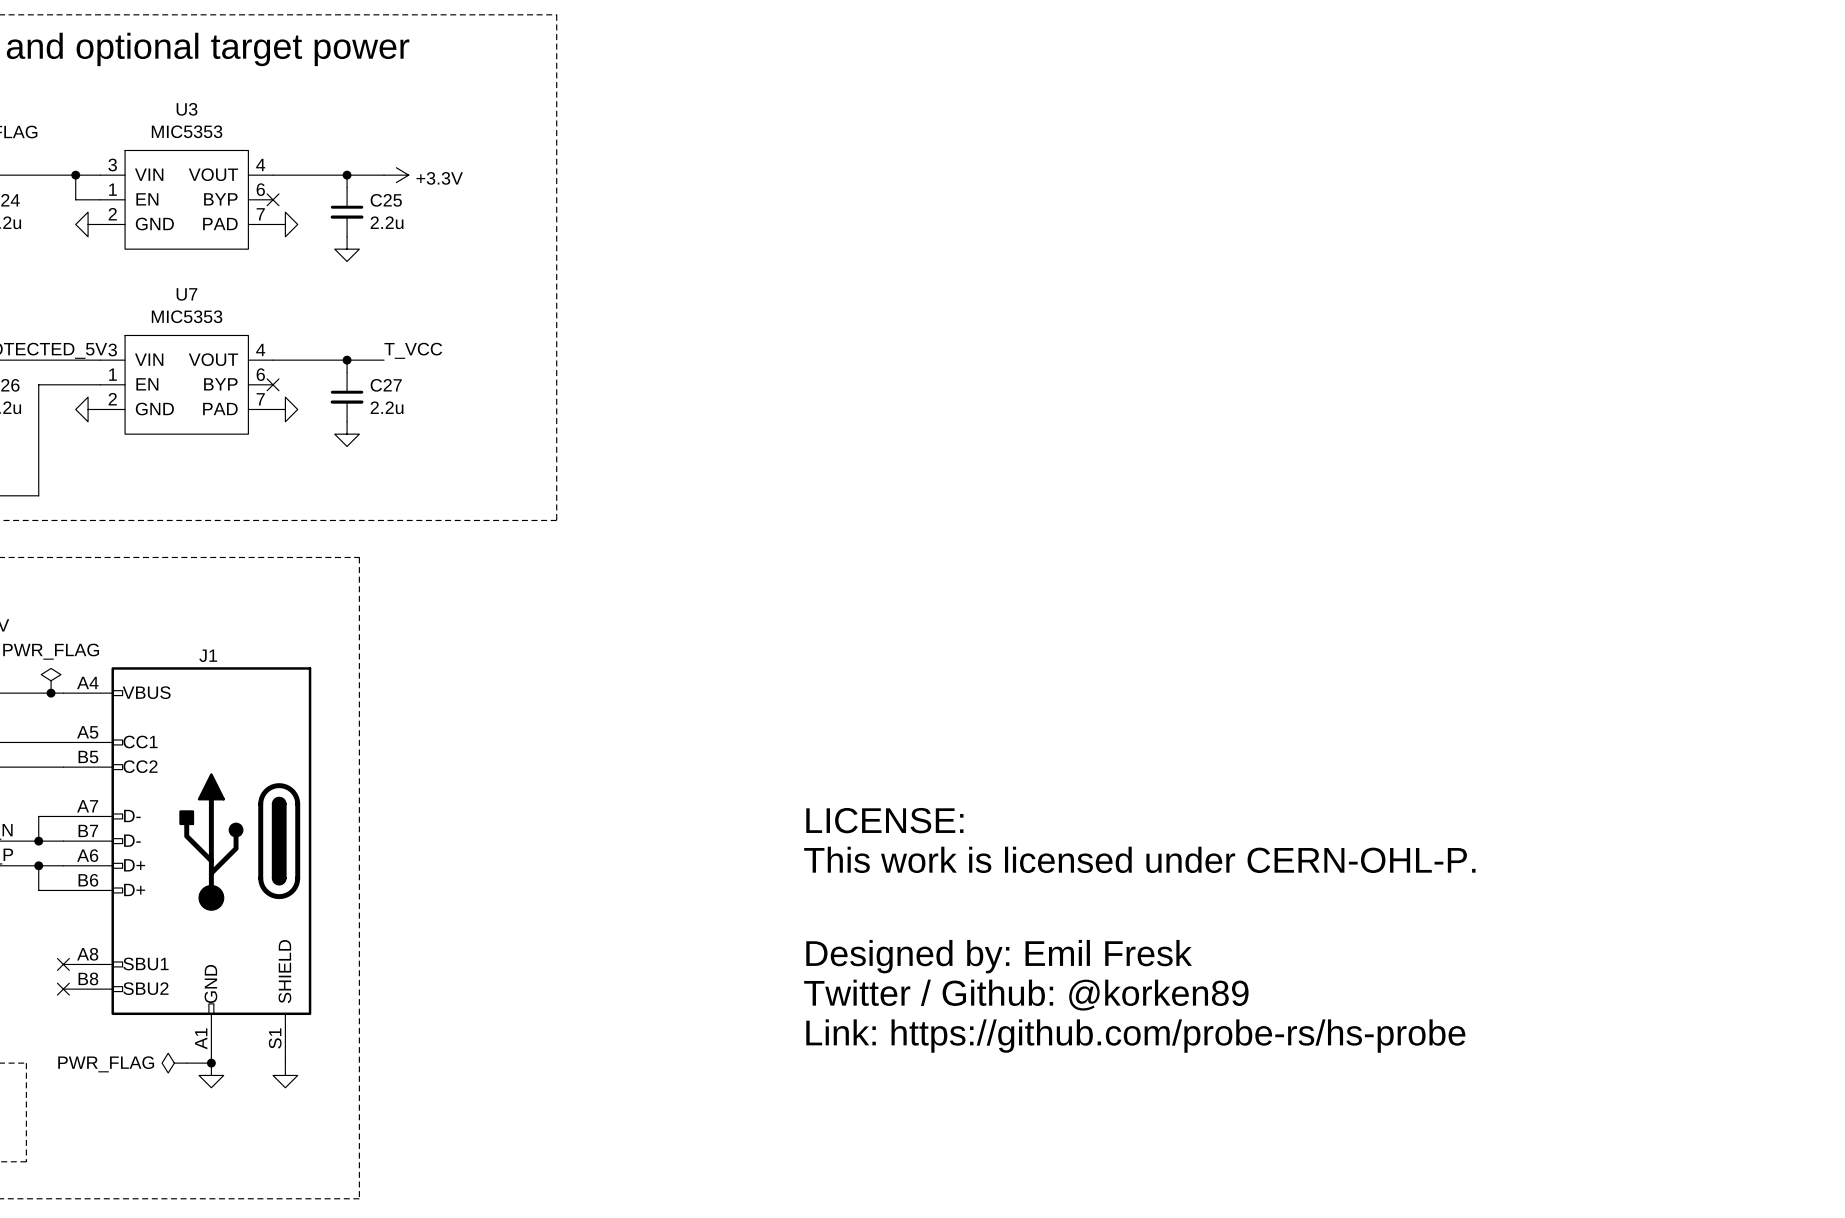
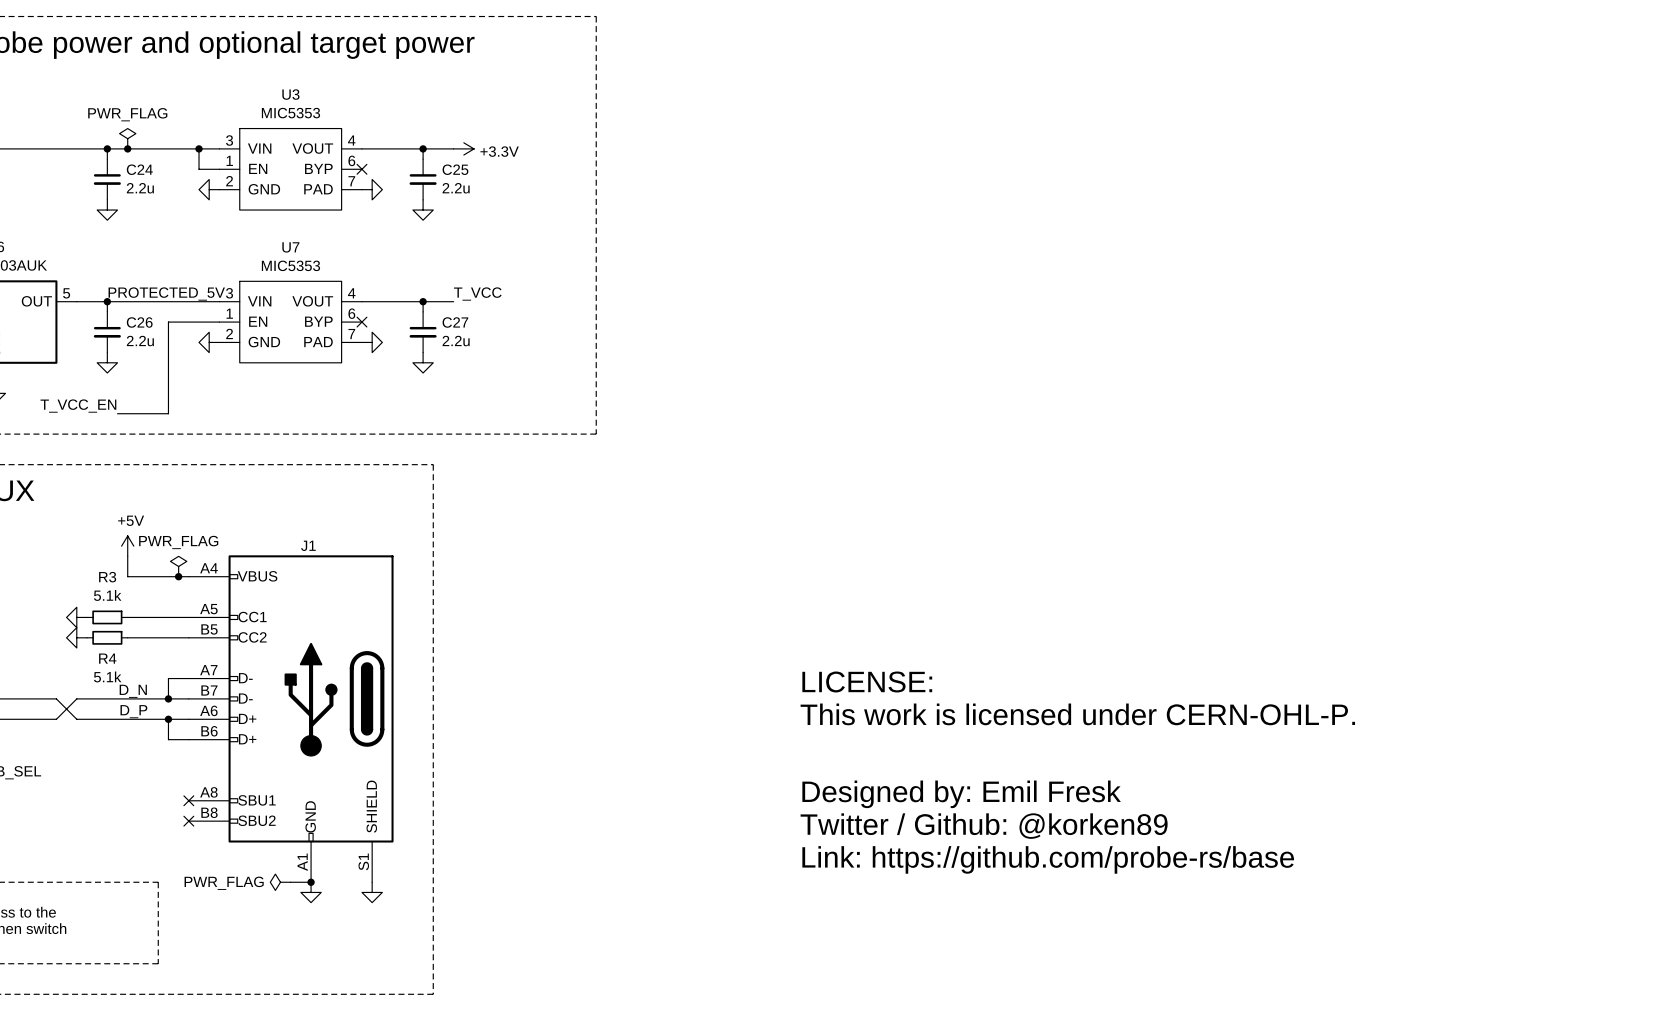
text: Link: https://github.com/probe-rs/hs-probe (1135, 1036) -> Link: https://github.com/probe-rs/base (1048, 859)

